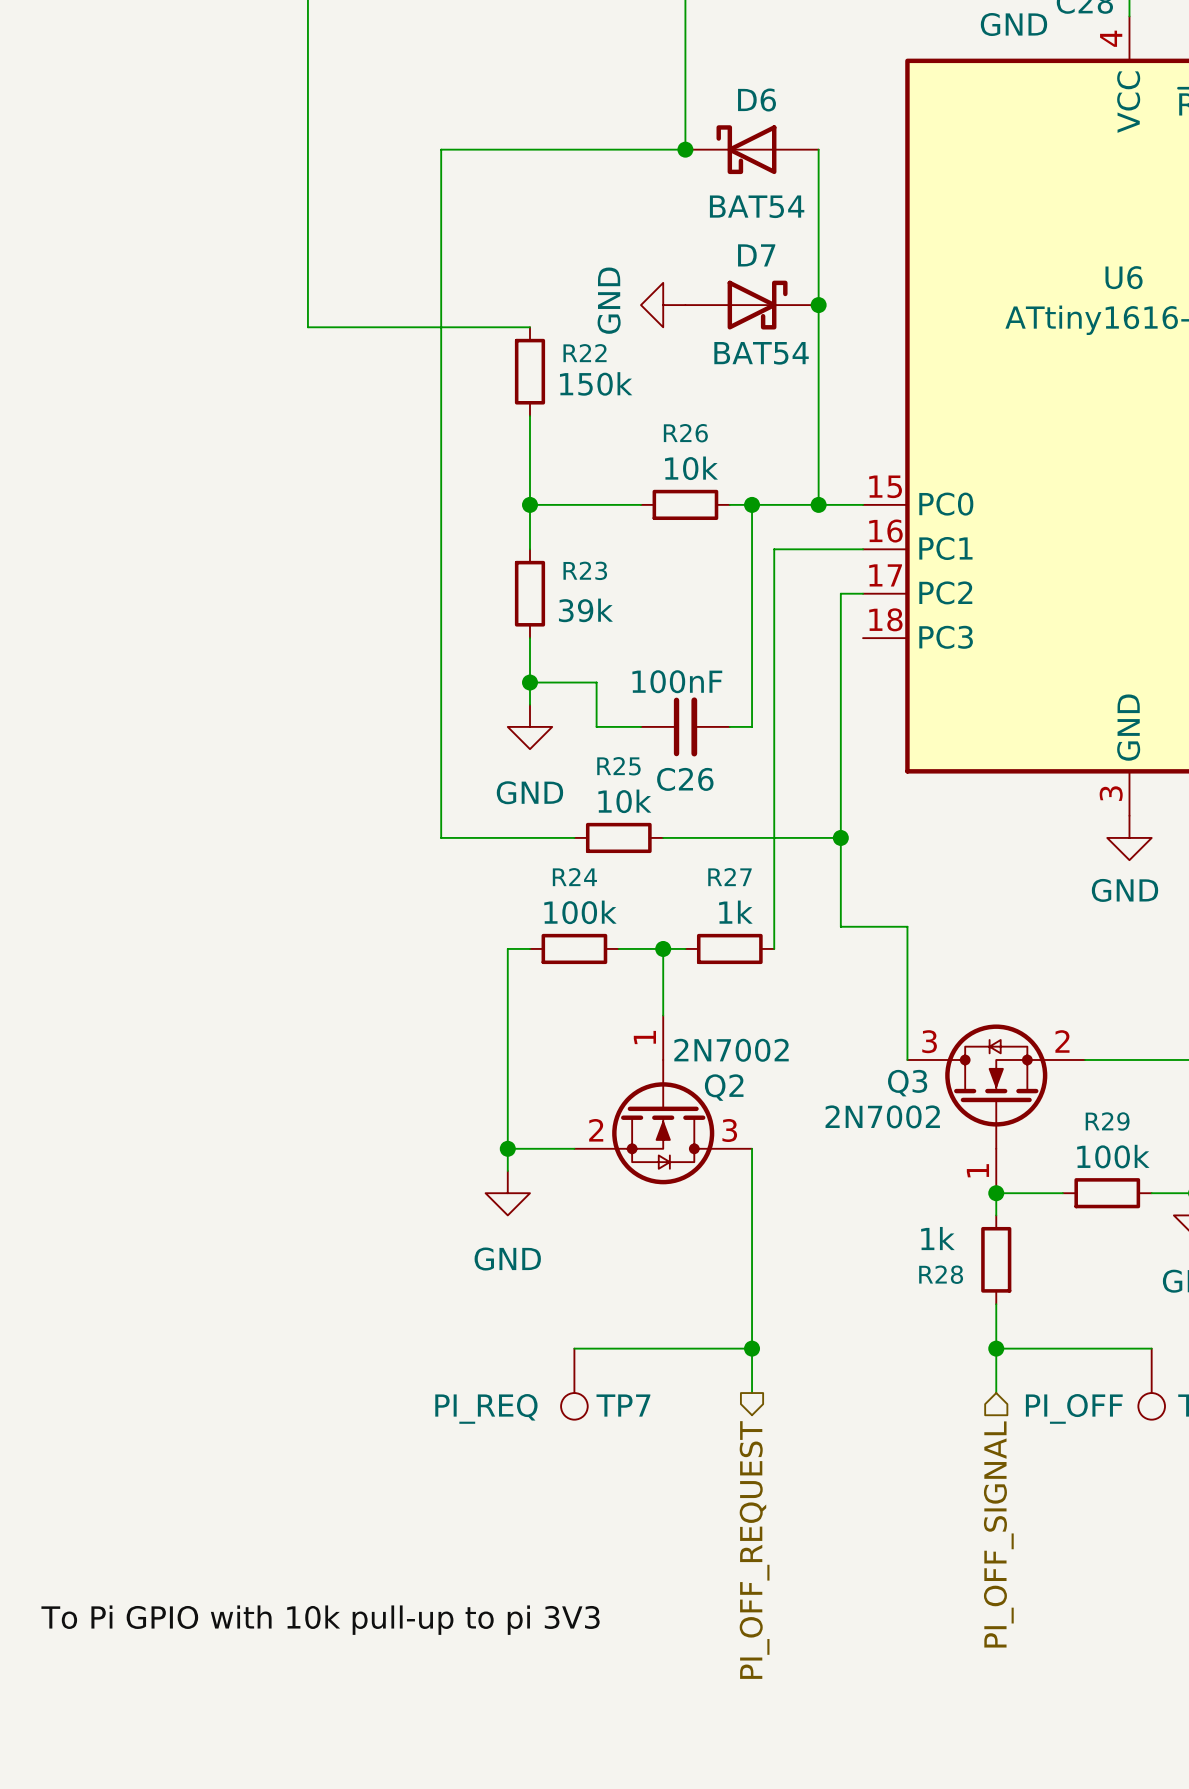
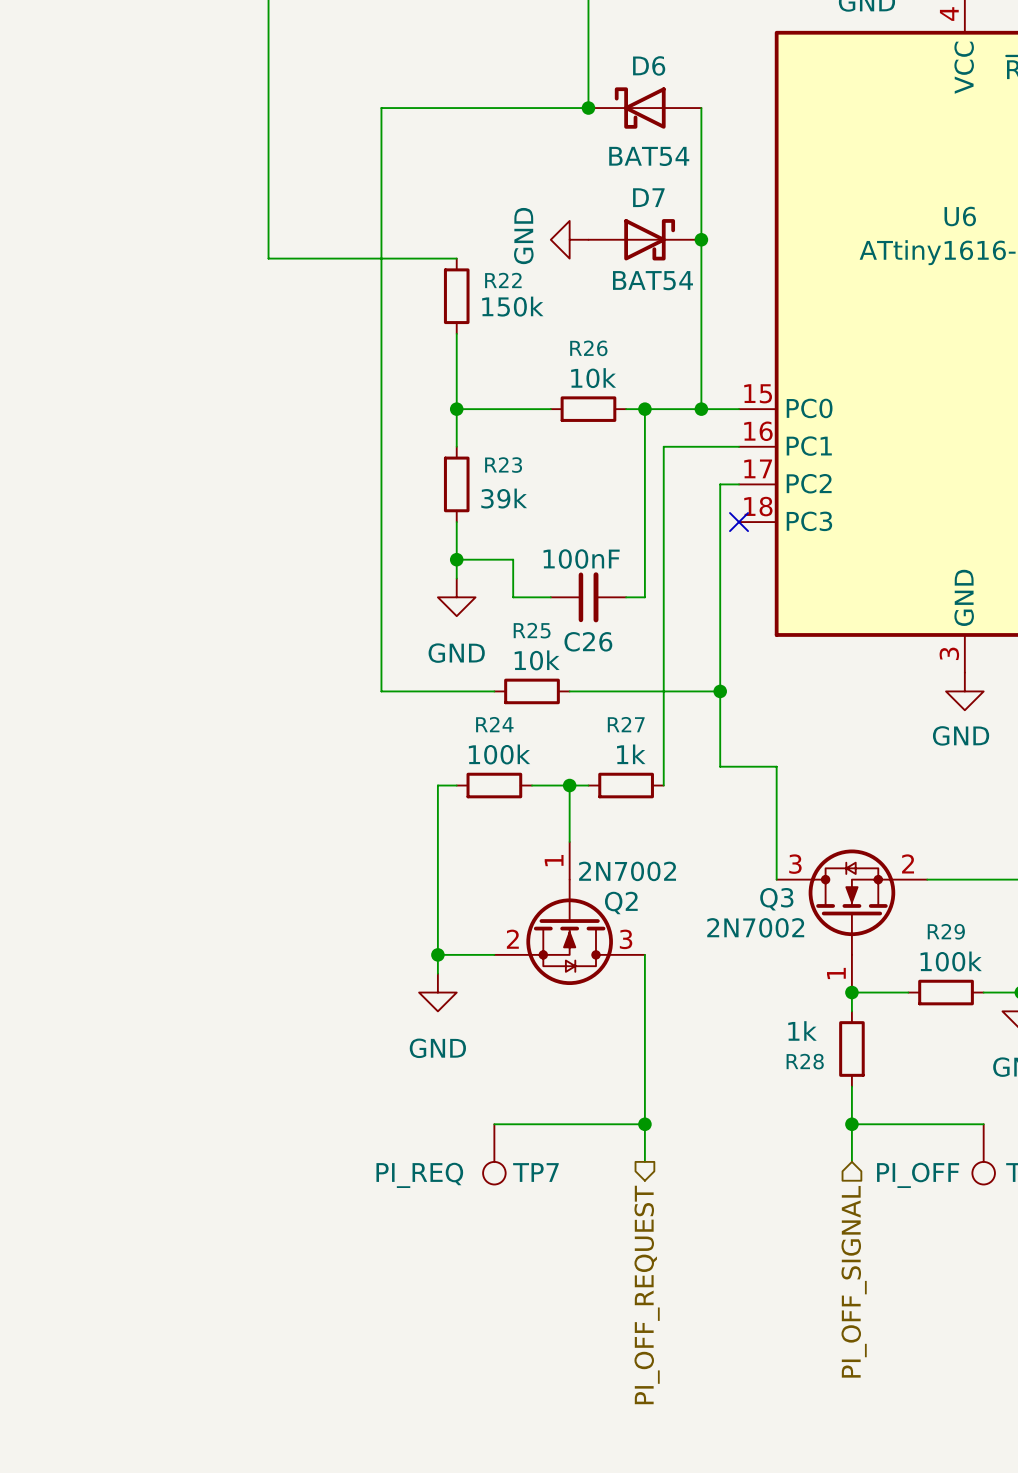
no-connect mark: none -> (739, 522)
label: To Pi GPIO with 10k pull-up to pi 3V3 (320, 1620) -> none

